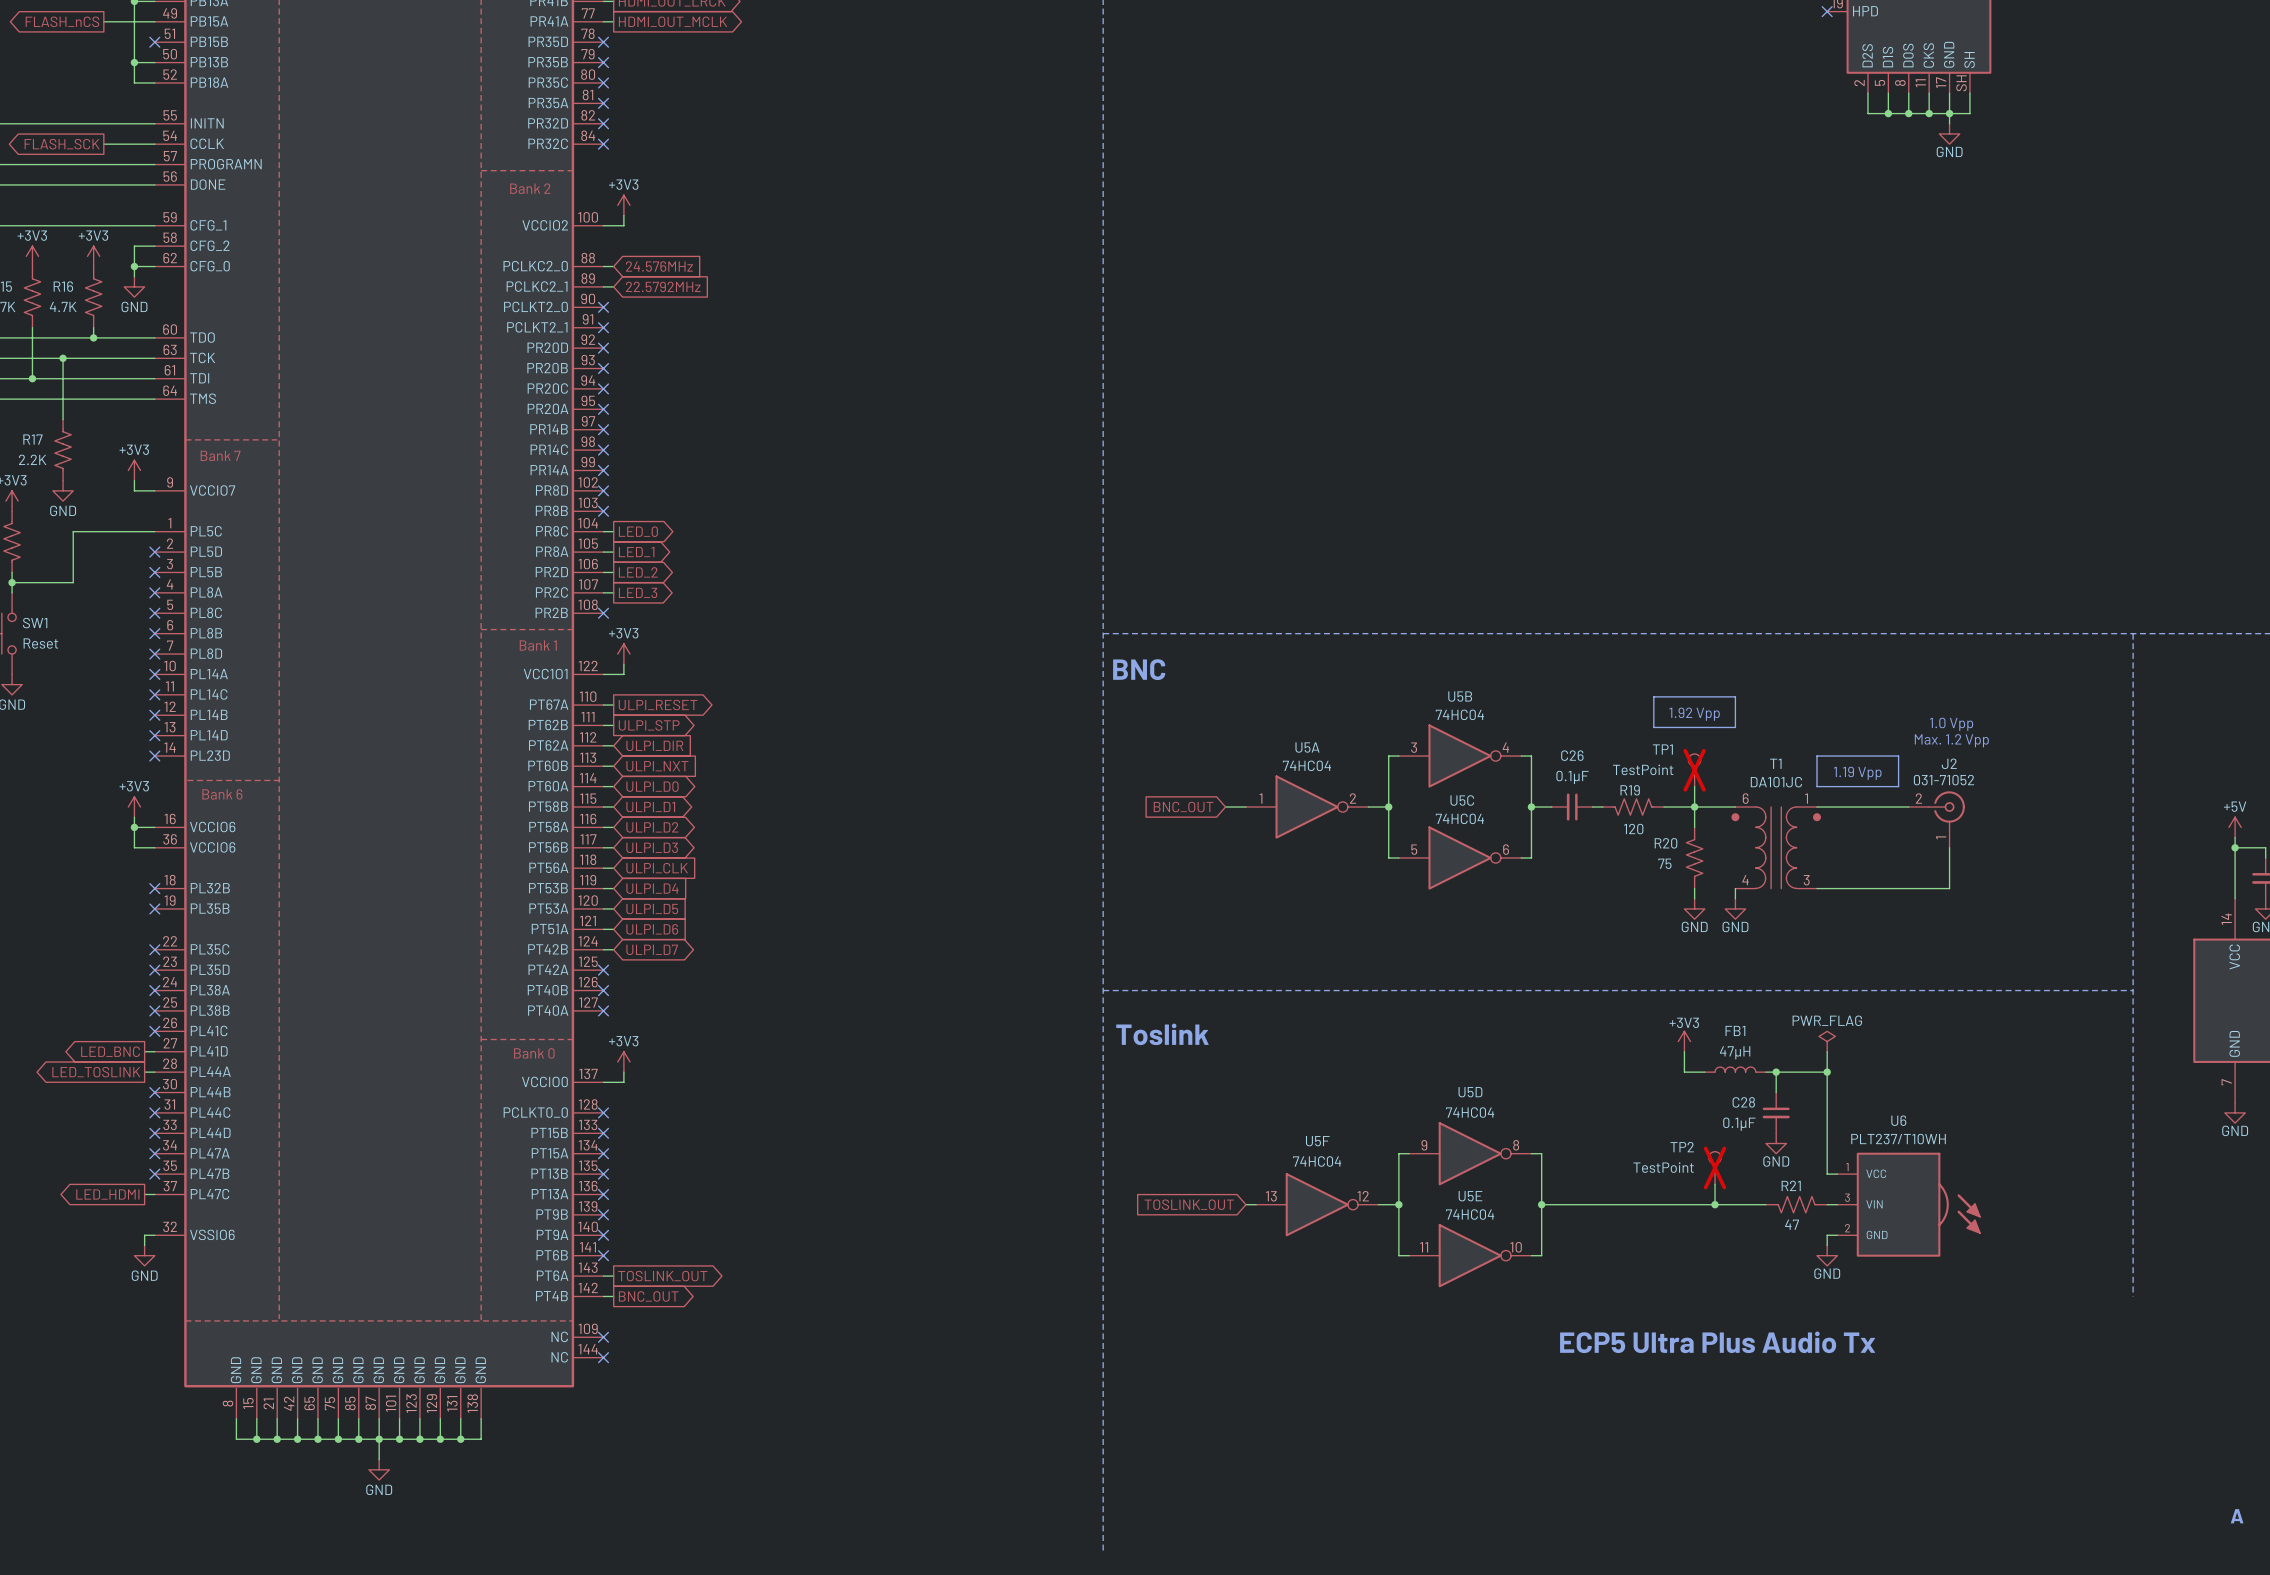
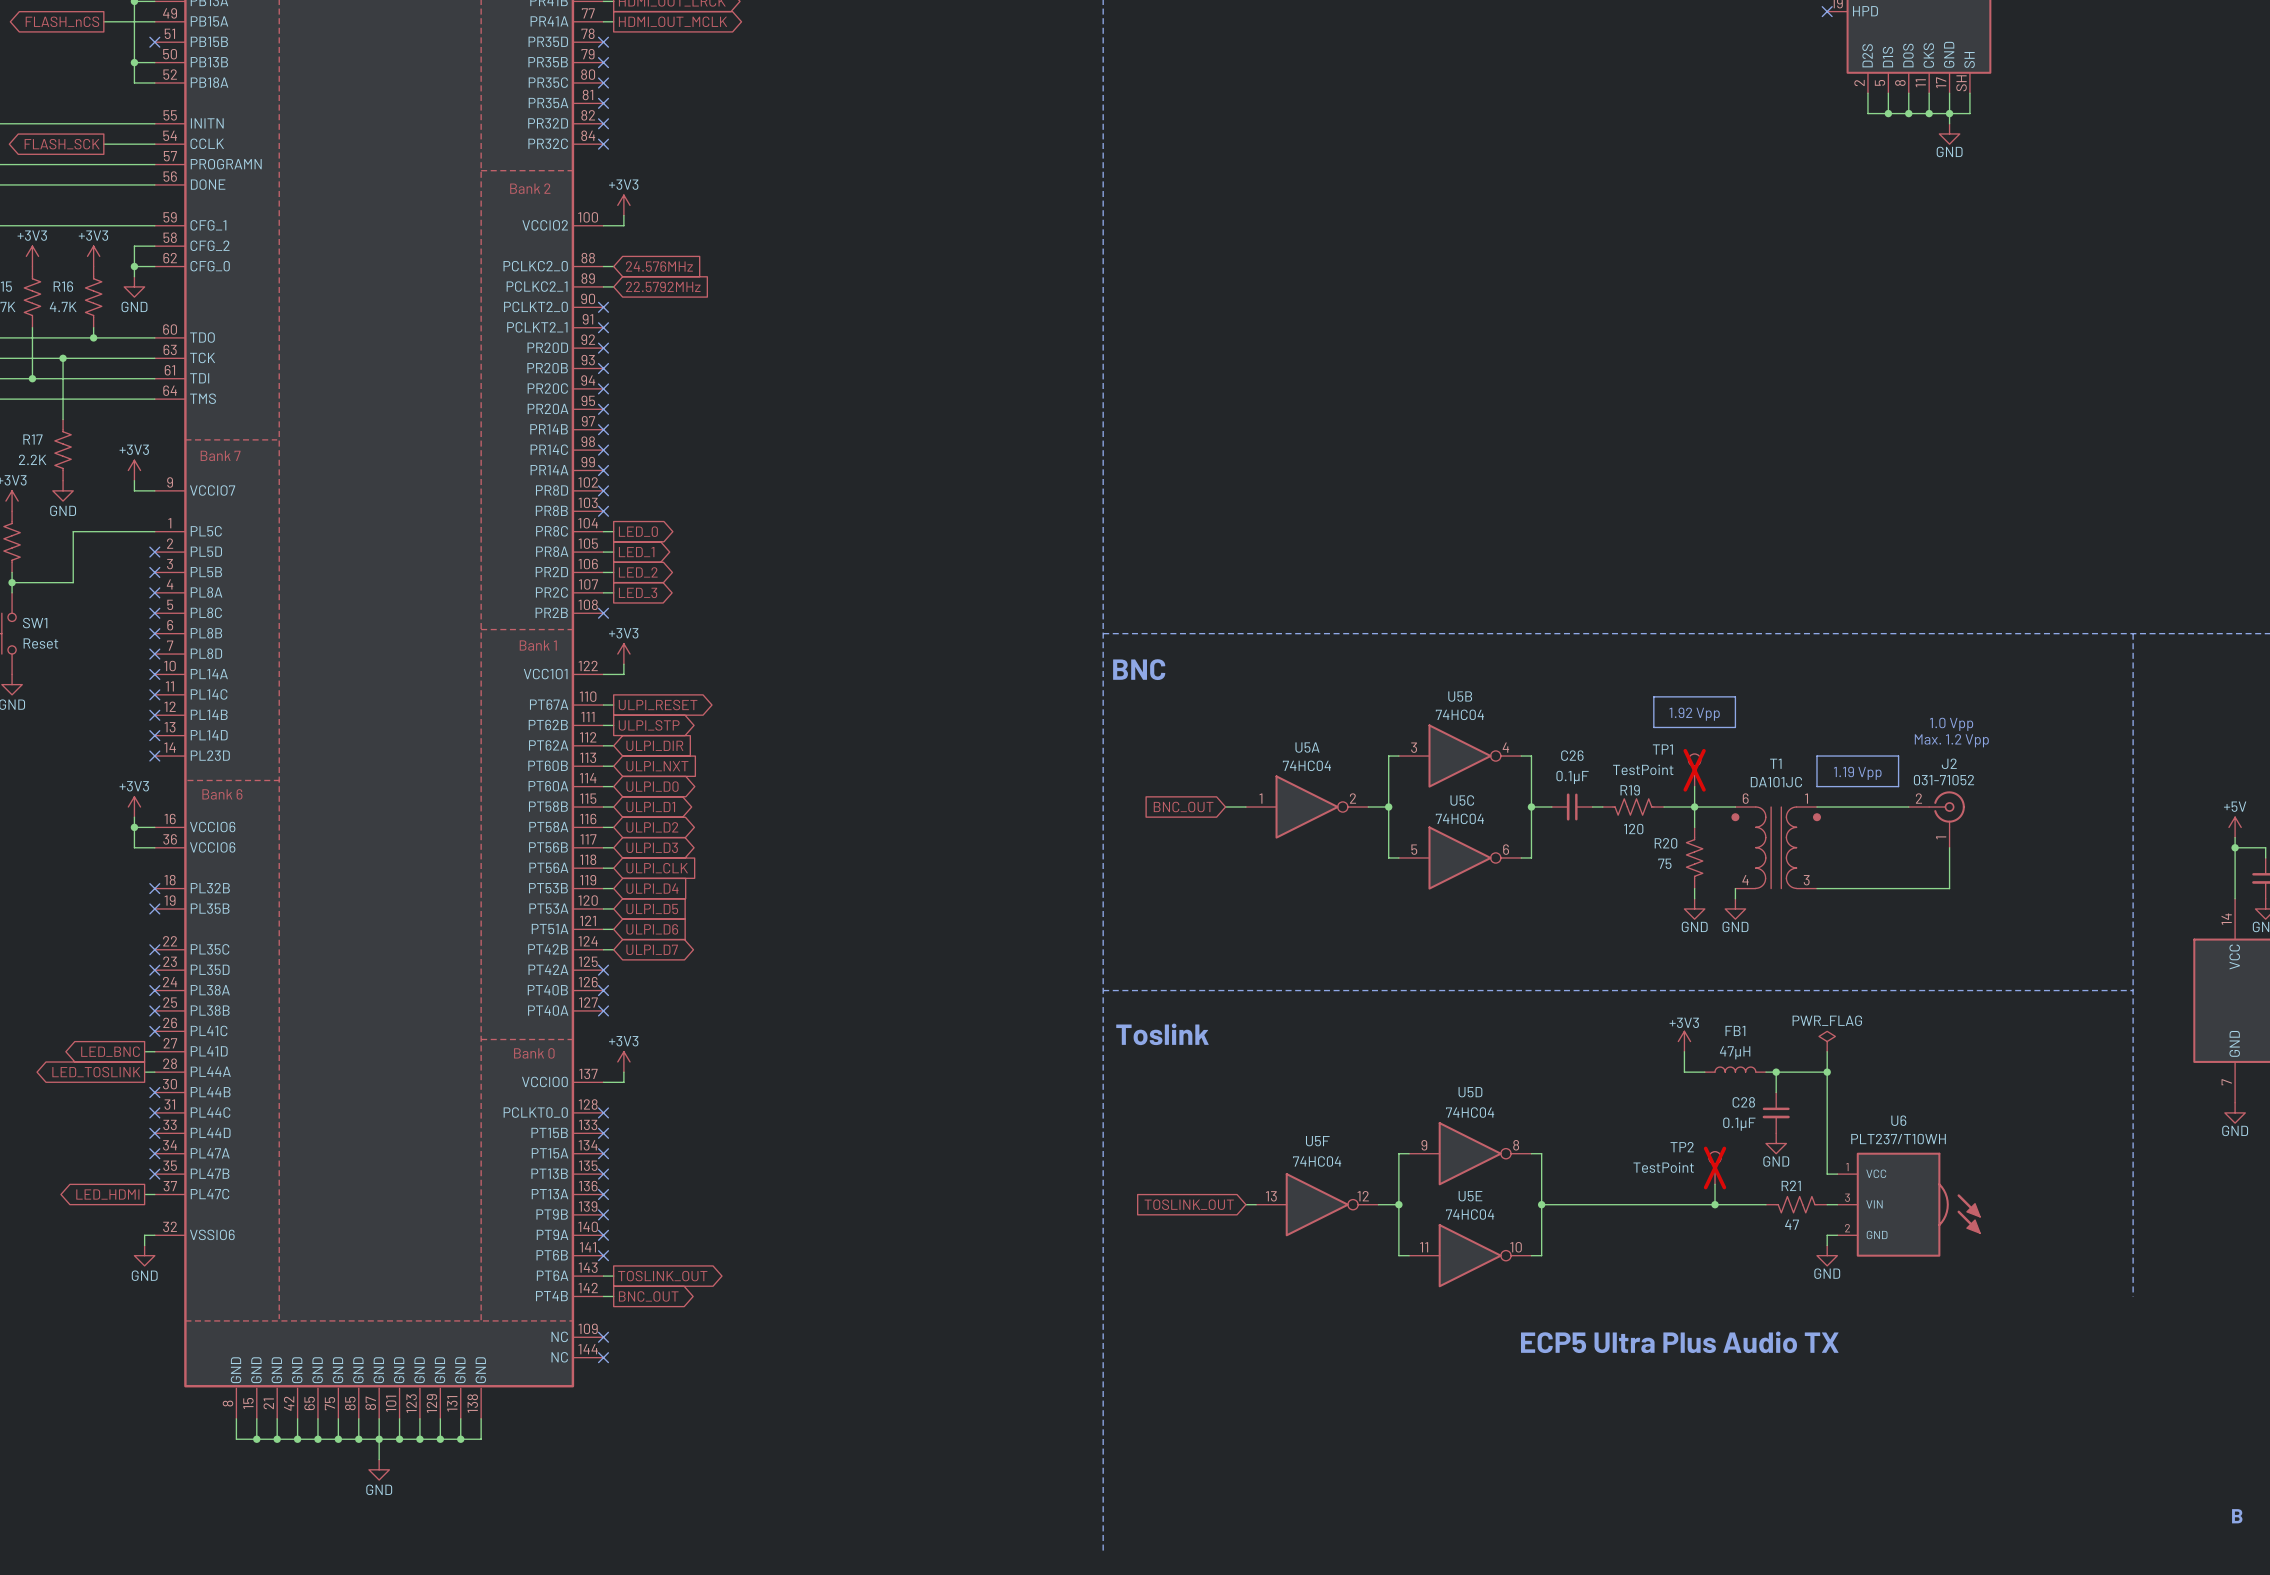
text: ECP5 Ultra Plus Audio Tx (1717, 1342) -> ECP5 Ultra Plus Audio TX (1679, 1342)
text: A (2237, 1516) -> B (2237, 1516)

